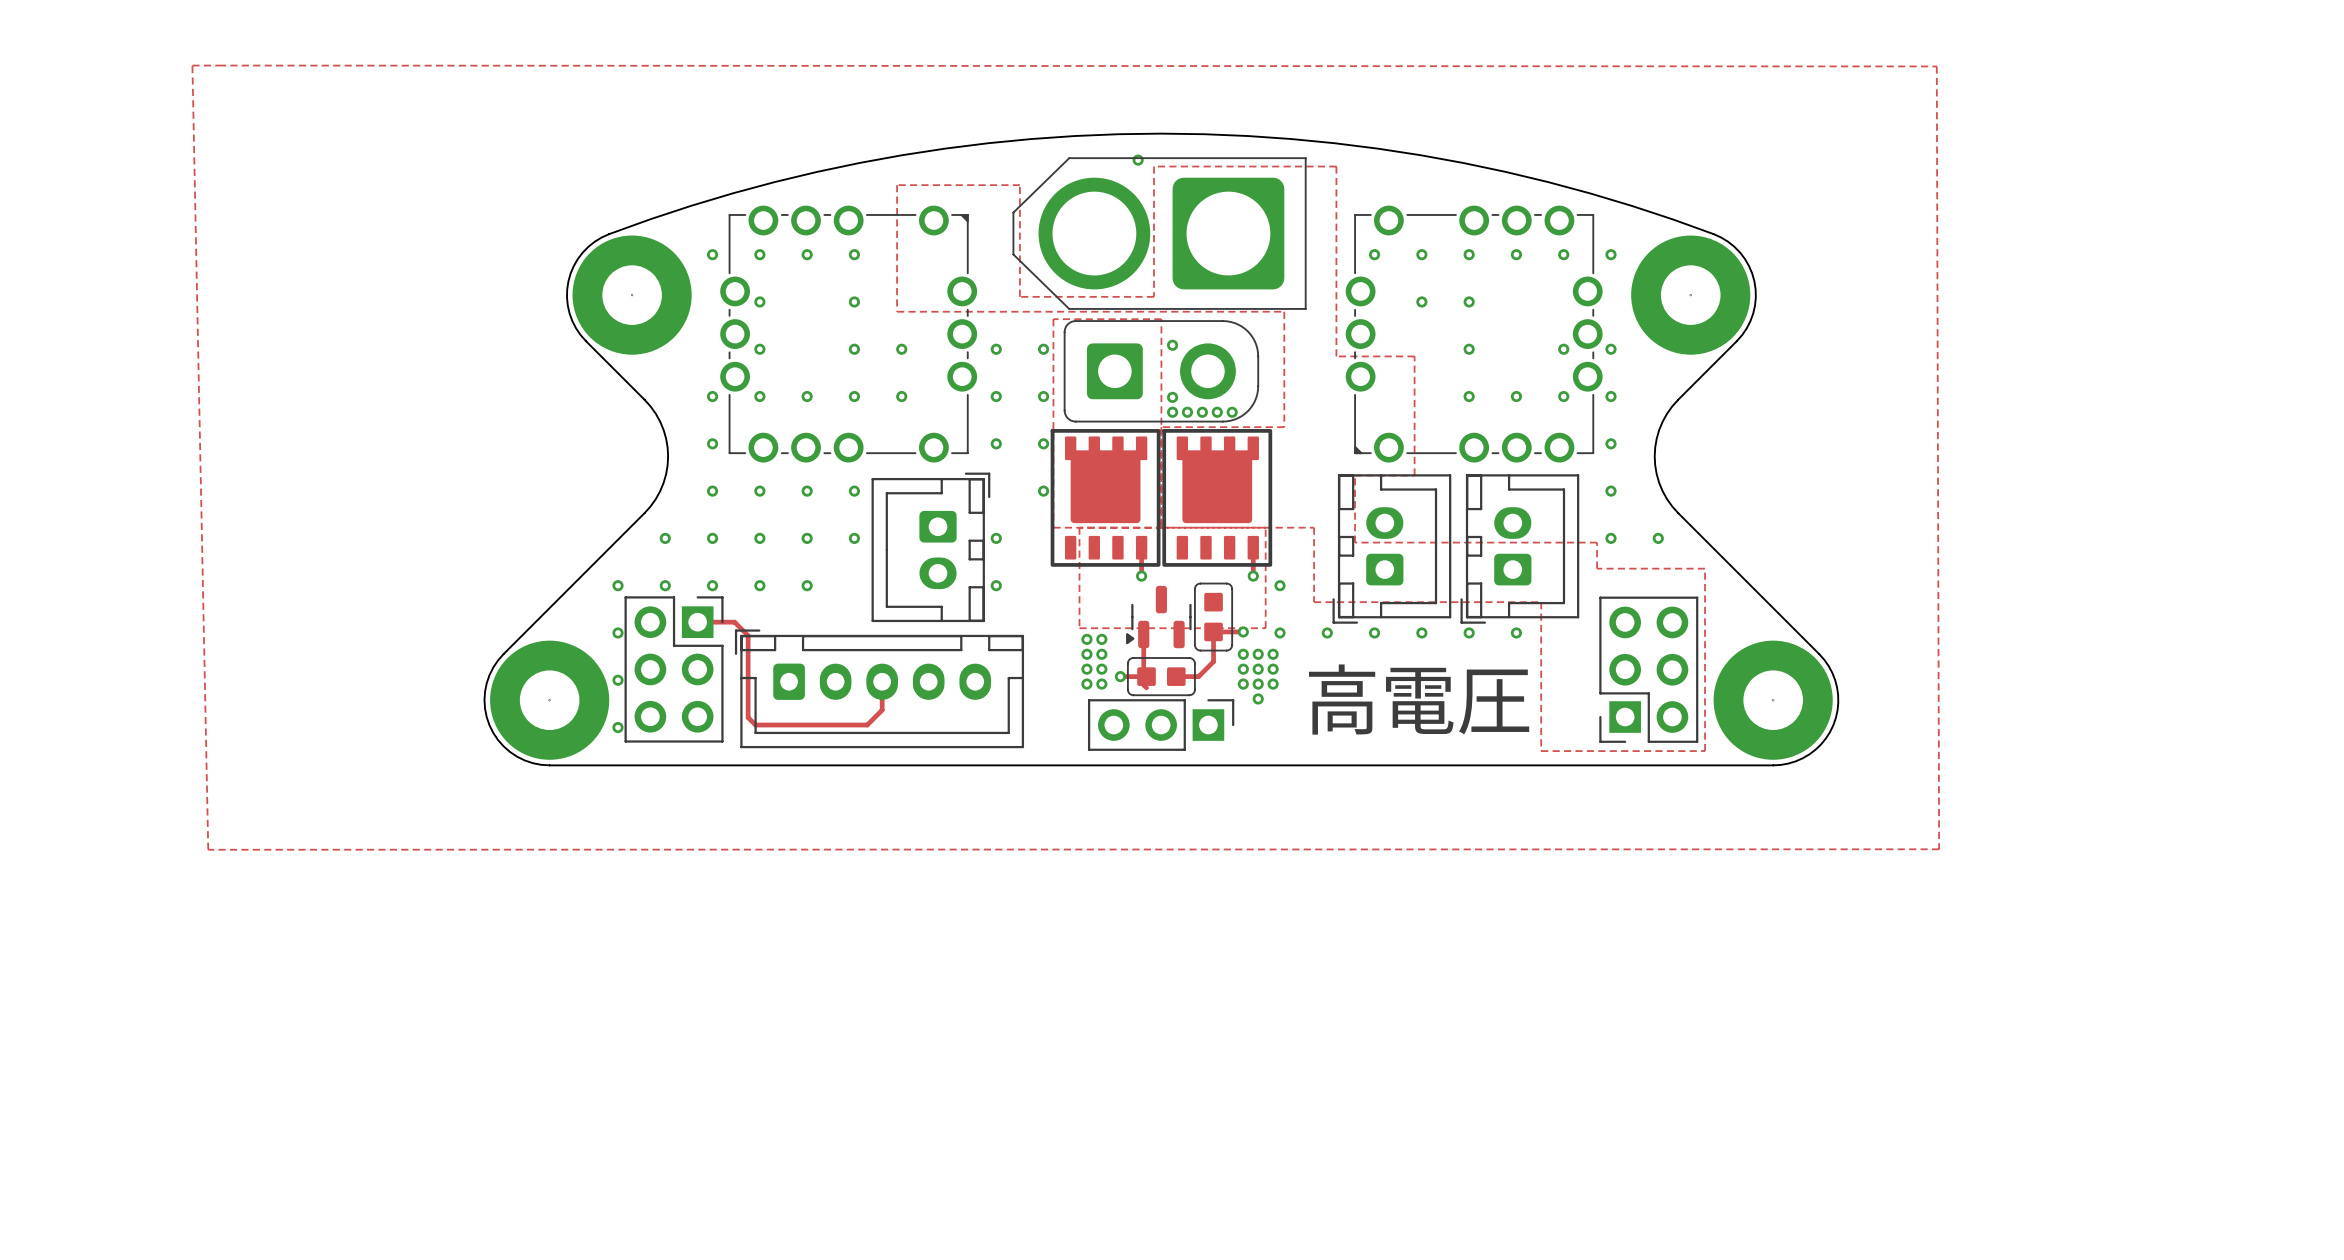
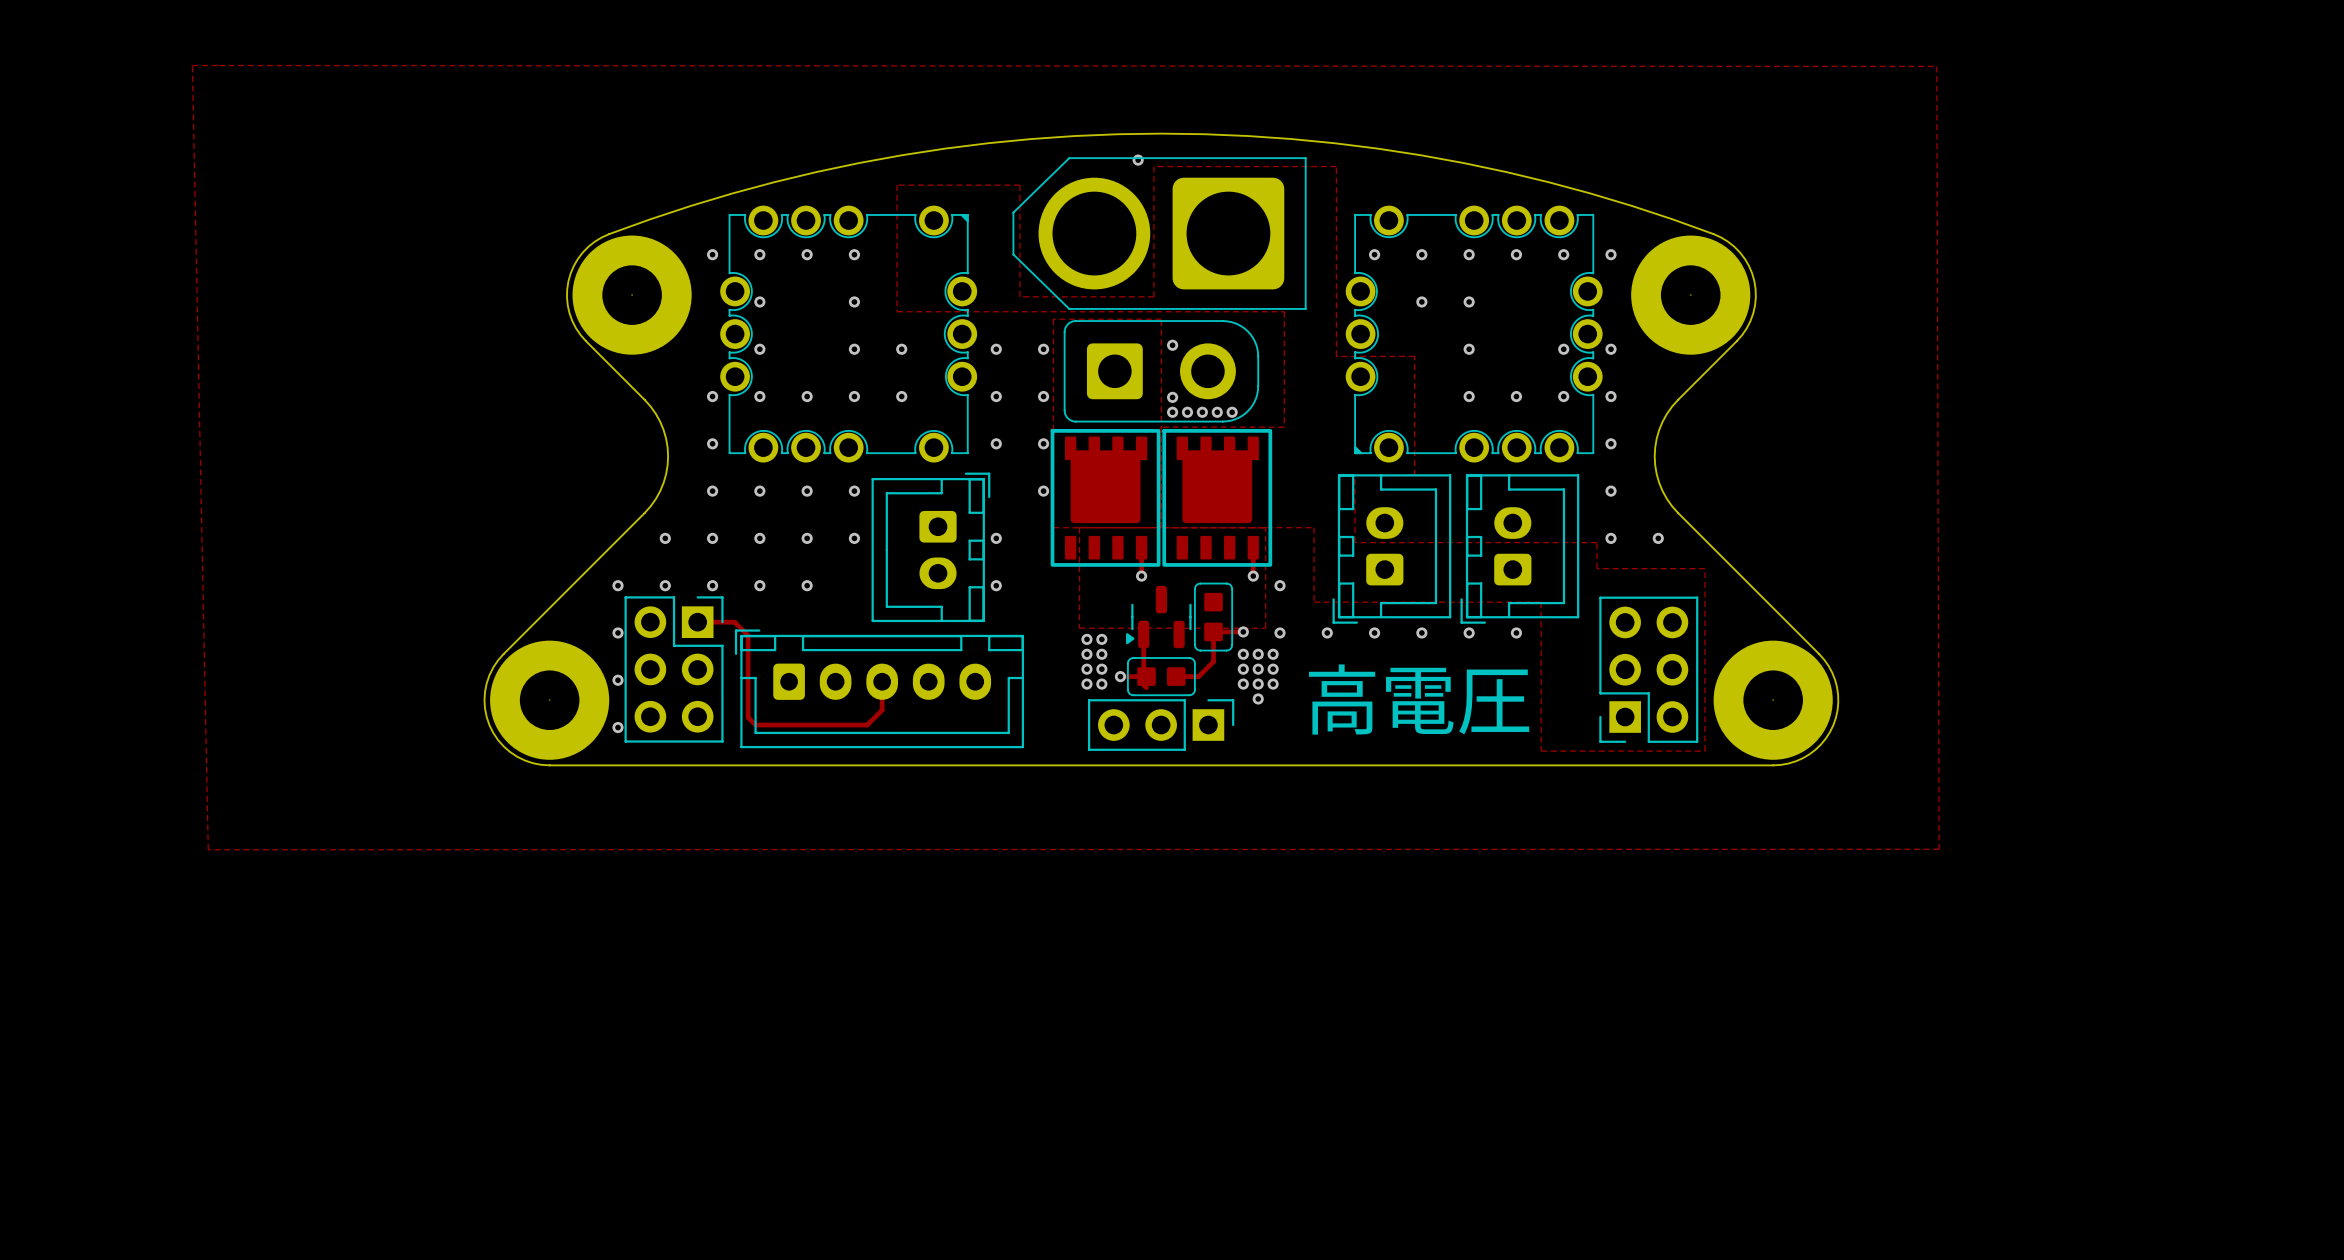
part footprint: [720, 205, 978, 463] -> [720, 205, 978, 463]
part footprint: [1345, 205, 1603, 463] -> [1345, 205, 1603, 463]

